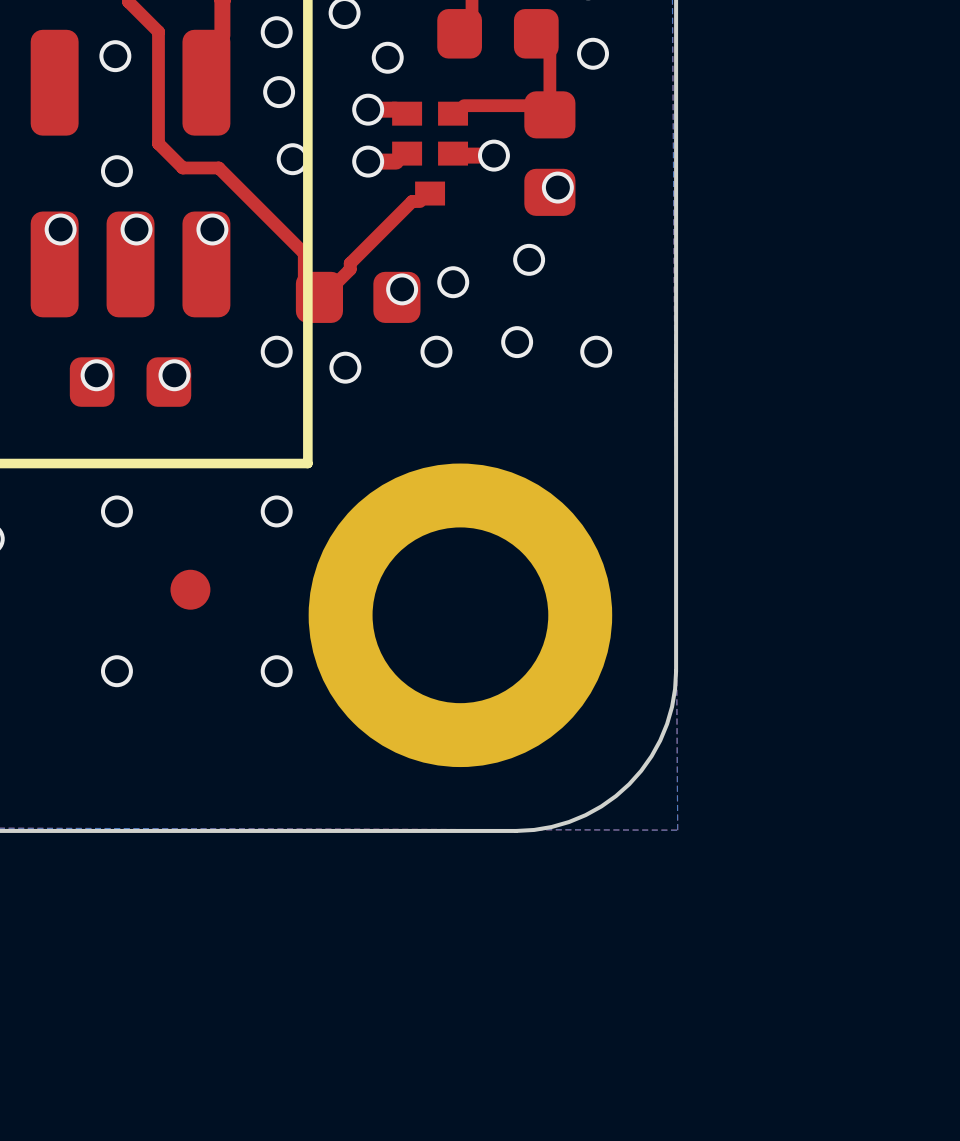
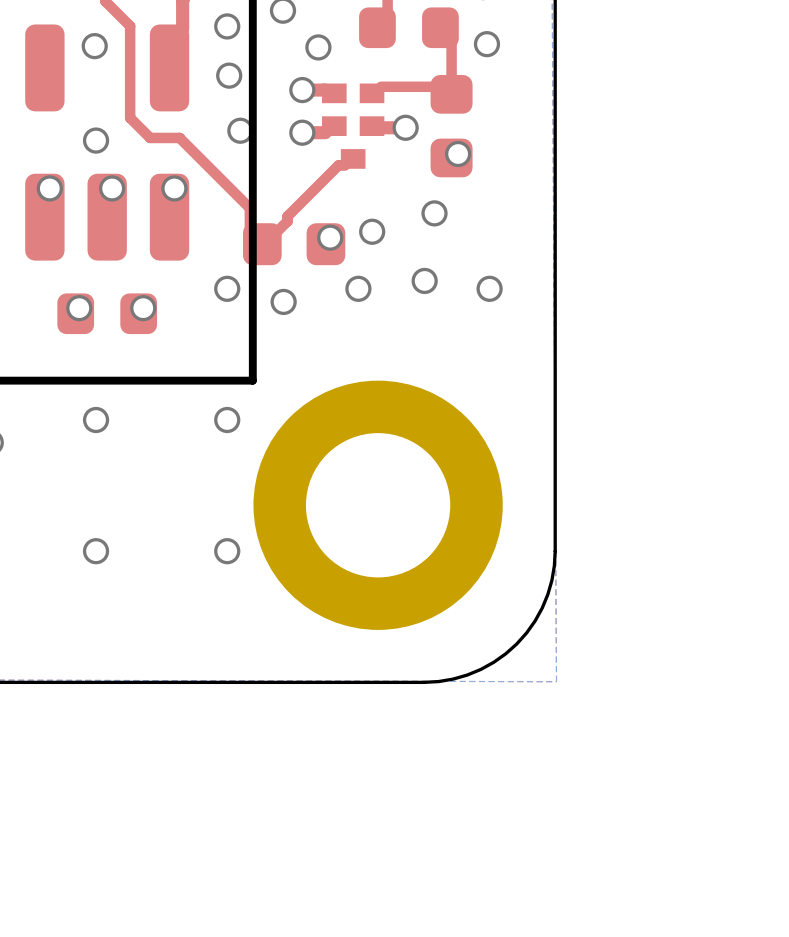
part: (190, 589) -> none

